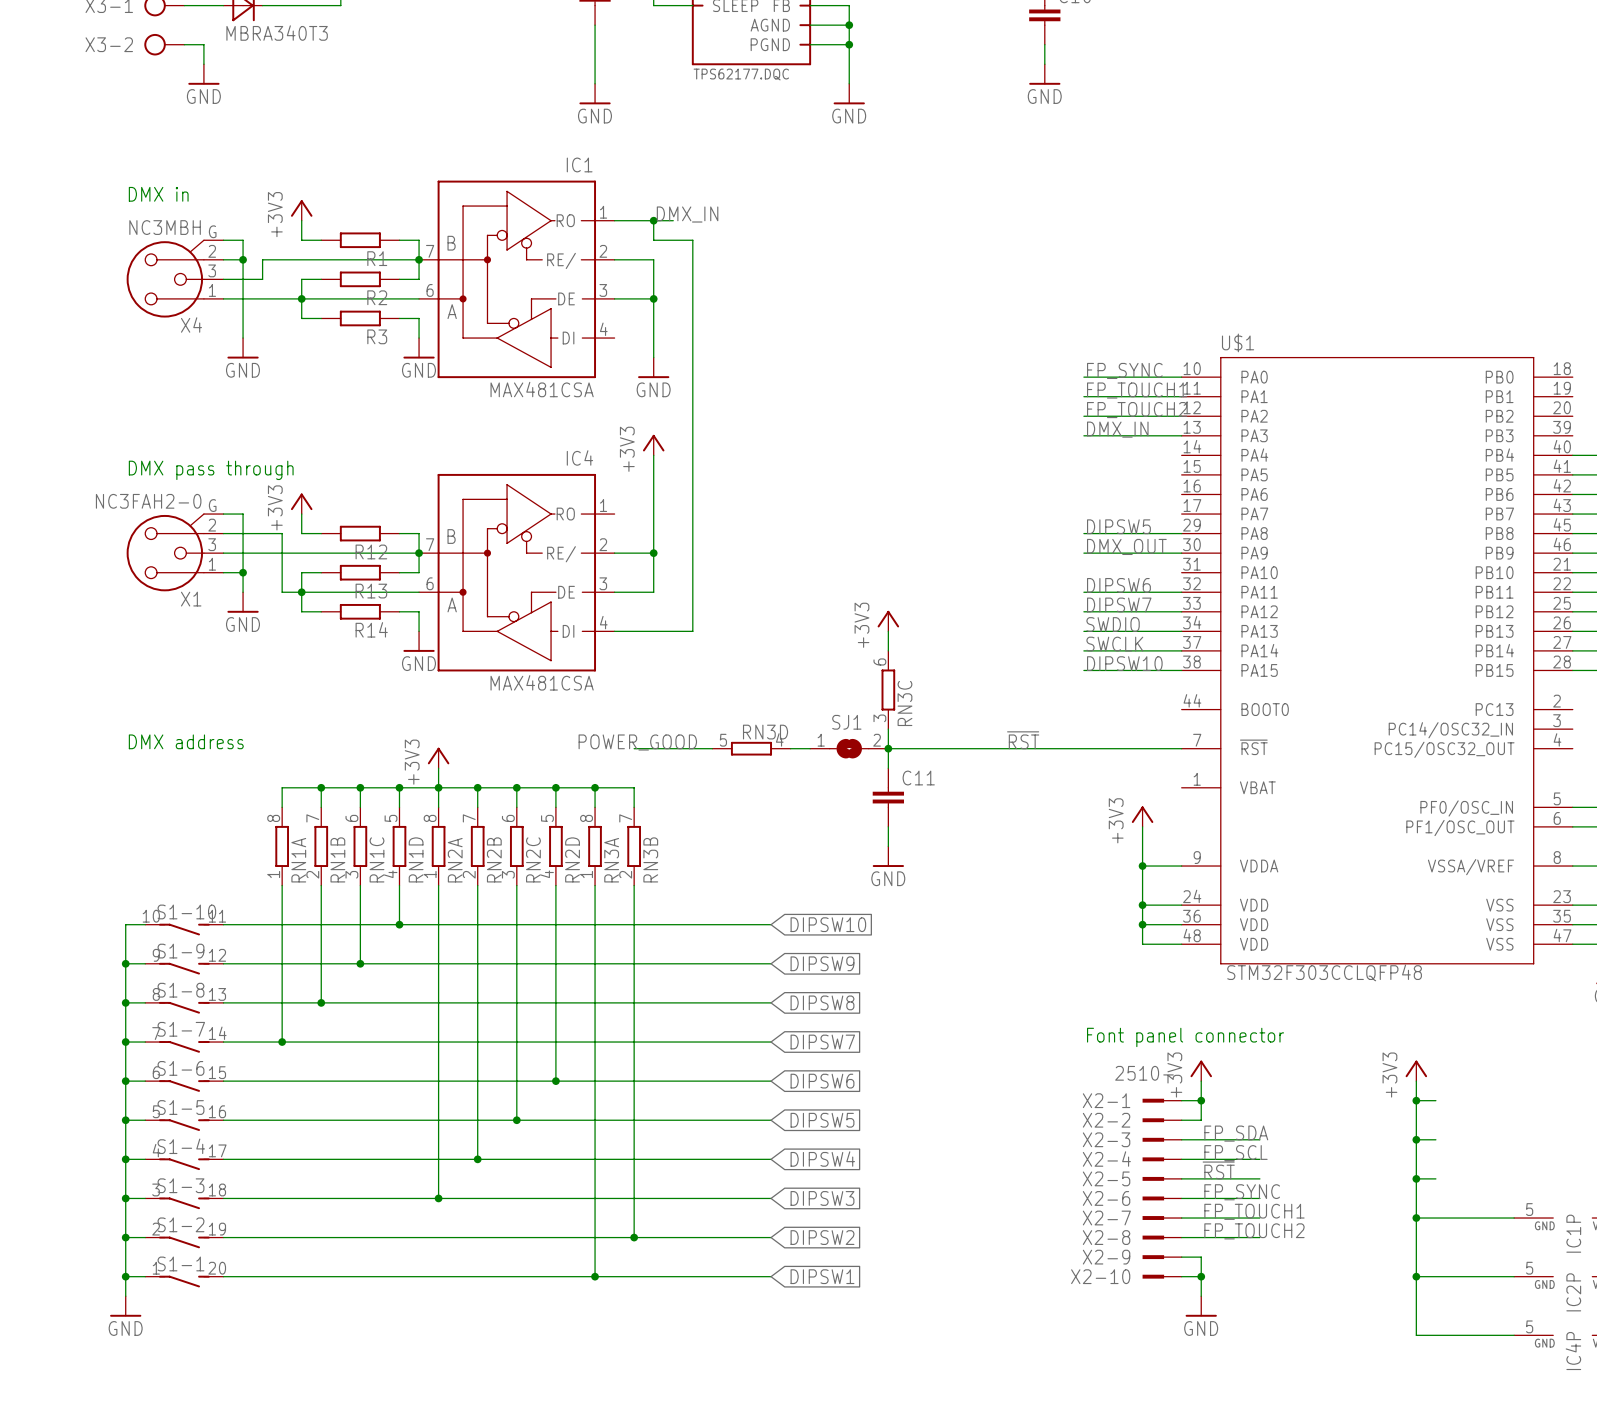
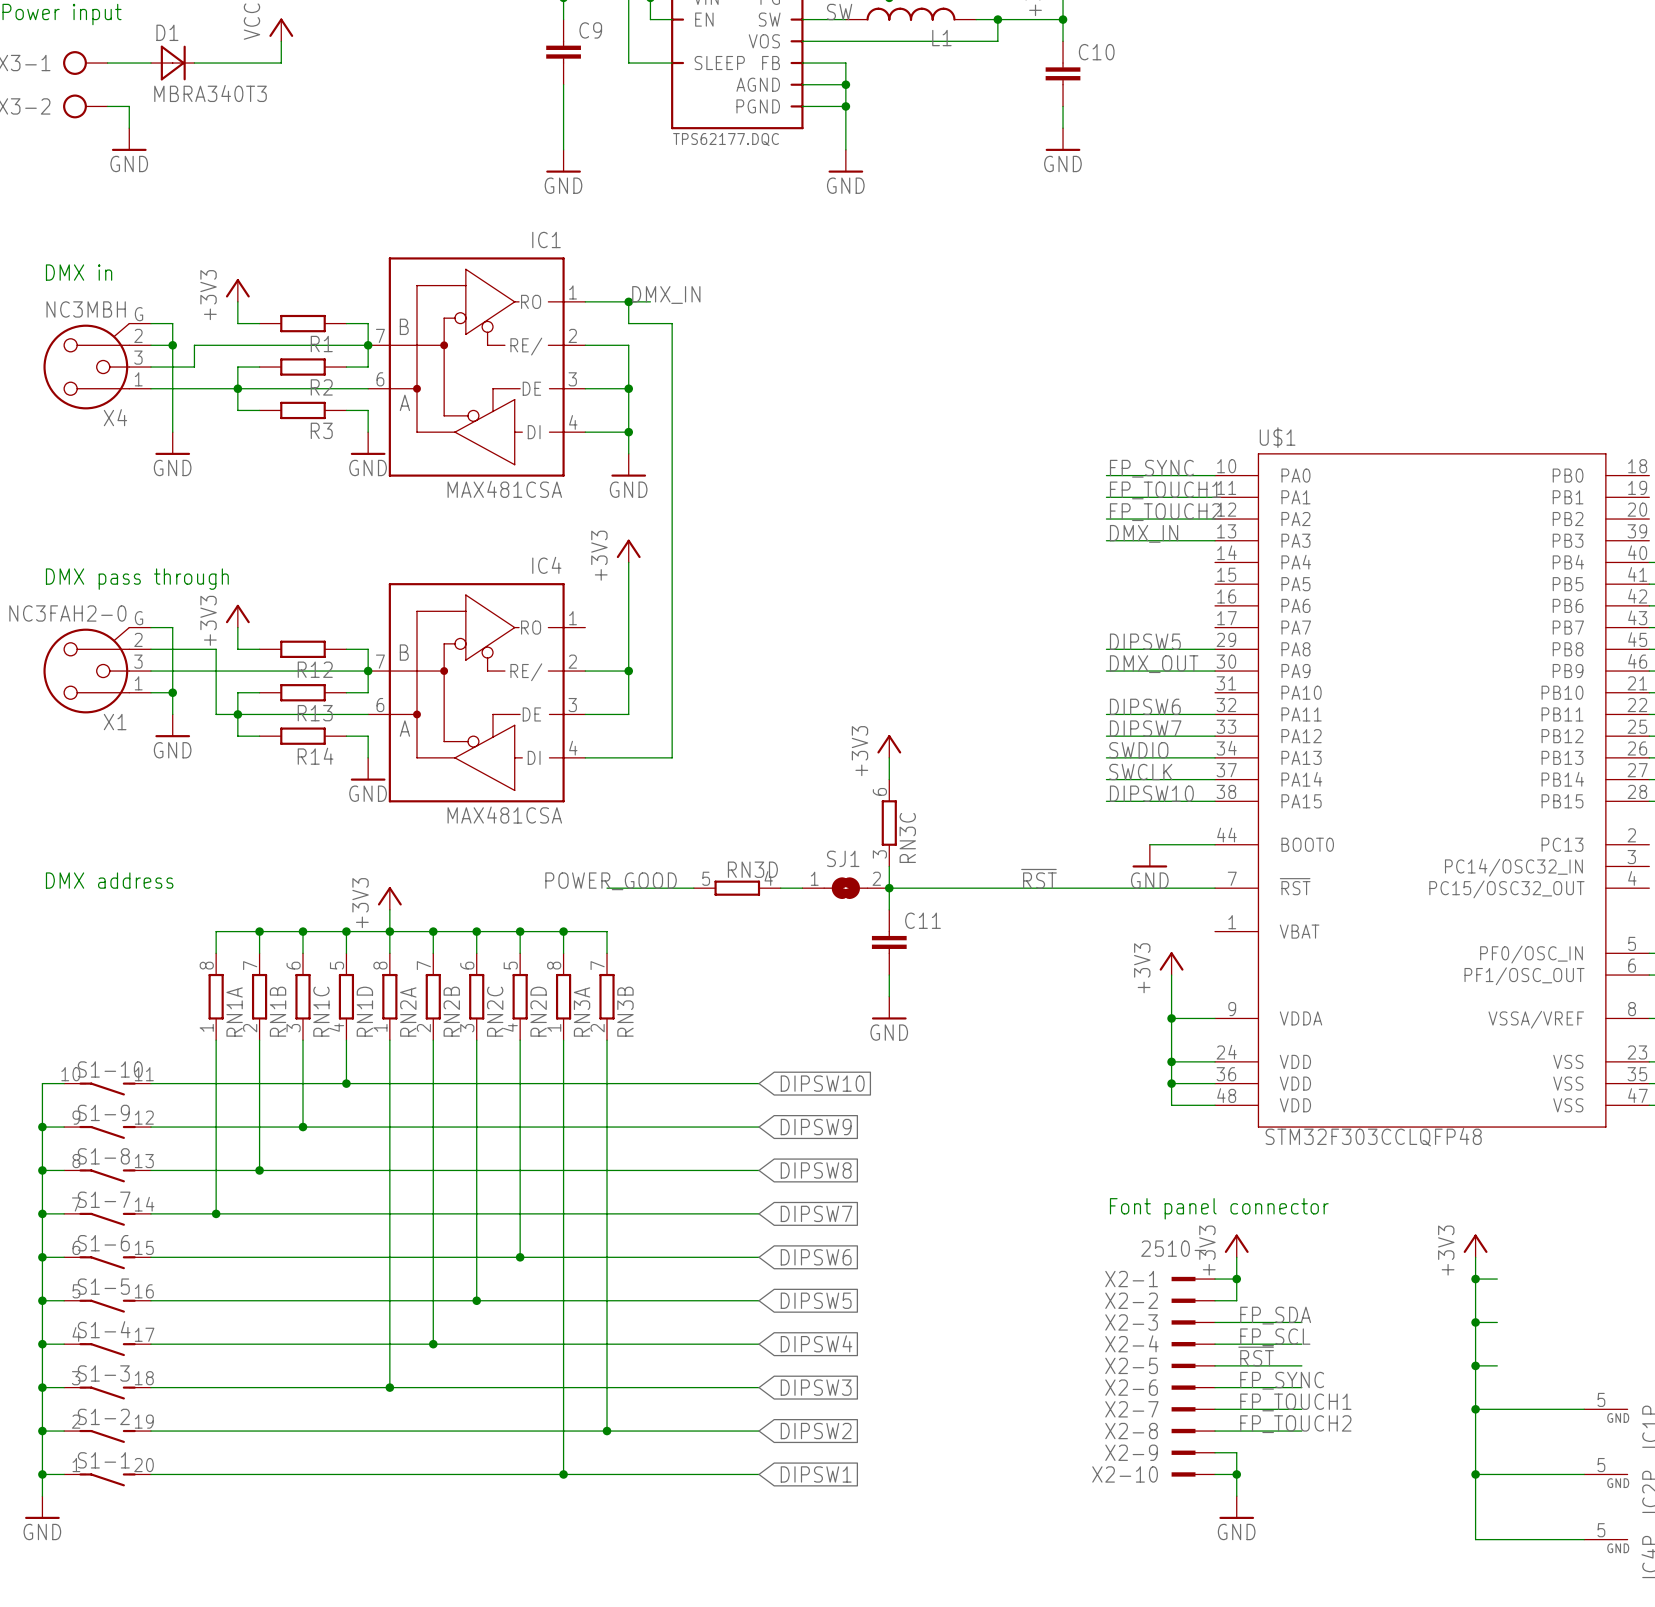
wire: none -> (585, 432) (628, 432)
junction: none -> (628, 432)
wire: none -> (1149, 844) (1215, 844)
power symbol: none -> GND (1149, 856)

